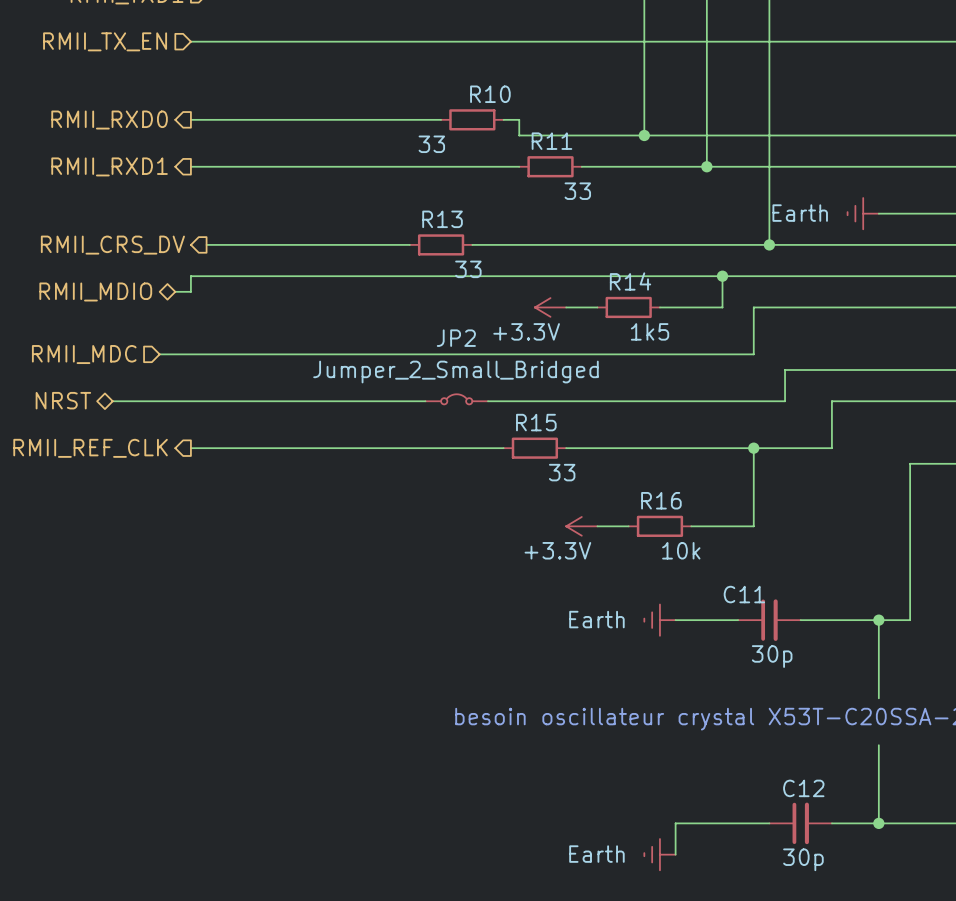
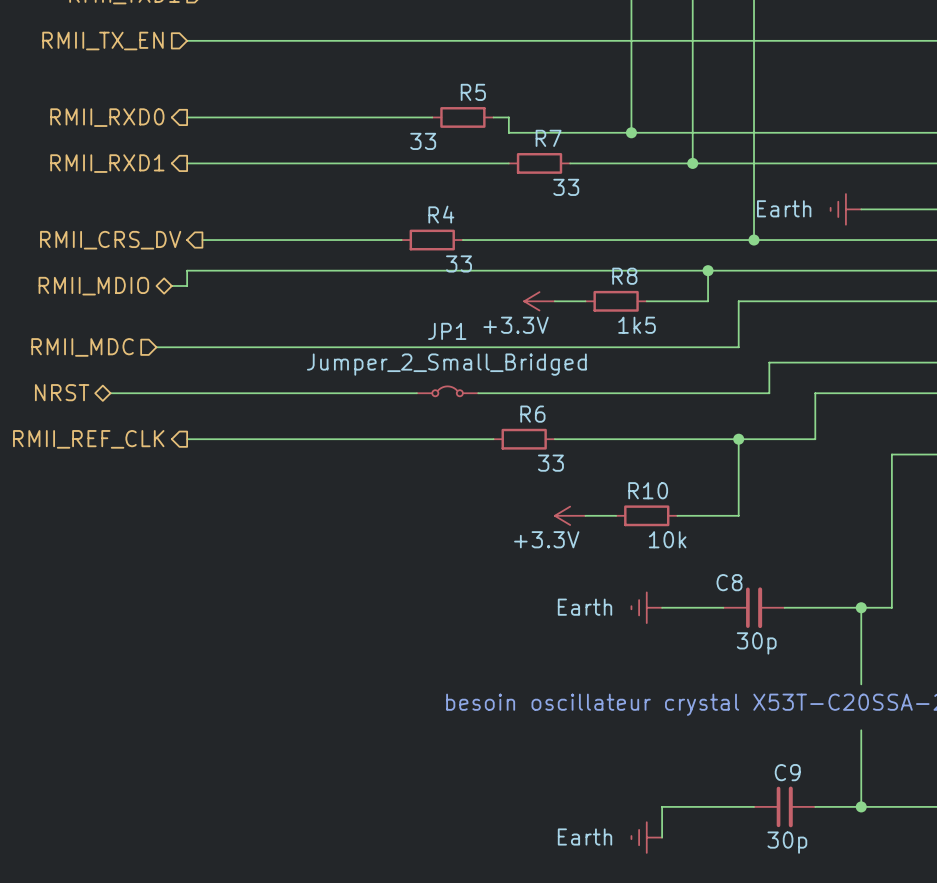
R10 name: R10 (490, 94) -> R5 (473, 92)
R11 name: R11 (551, 141) -> R7 (548, 138)
R13 name: R13 (442, 219) -> R4 (441, 214)
R14 name: R14 (630, 281) -> R8 (624, 276)
JP2 name: JP2 (456, 338) -> JP1 (447, 331)
R15 name: R15 (536, 422) -> R6 (532, 414)
R16 name: R16 (661, 500) -> R10 (648, 490)
C11 name: C11 (744, 594) -> C8 (729, 582)
C12 name: C12 (803, 788) -> C9 (787, 772)

